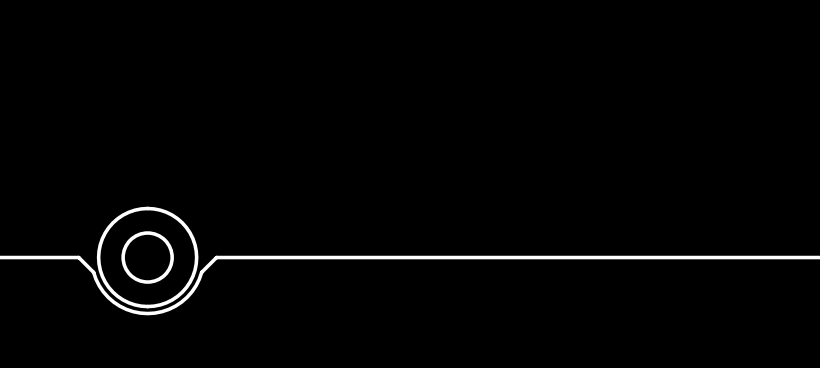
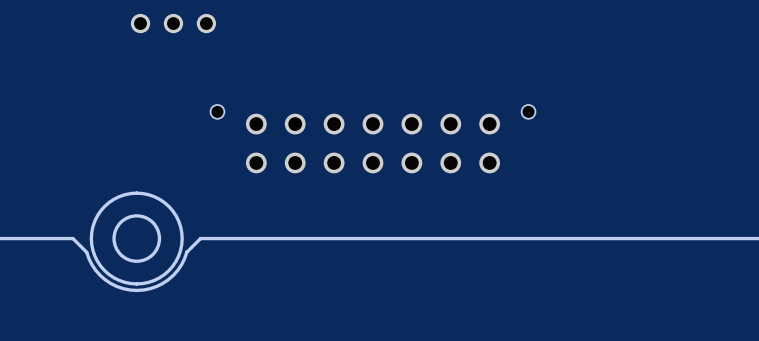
part: none -> (173, 23)
part: none -> (373, 139)

